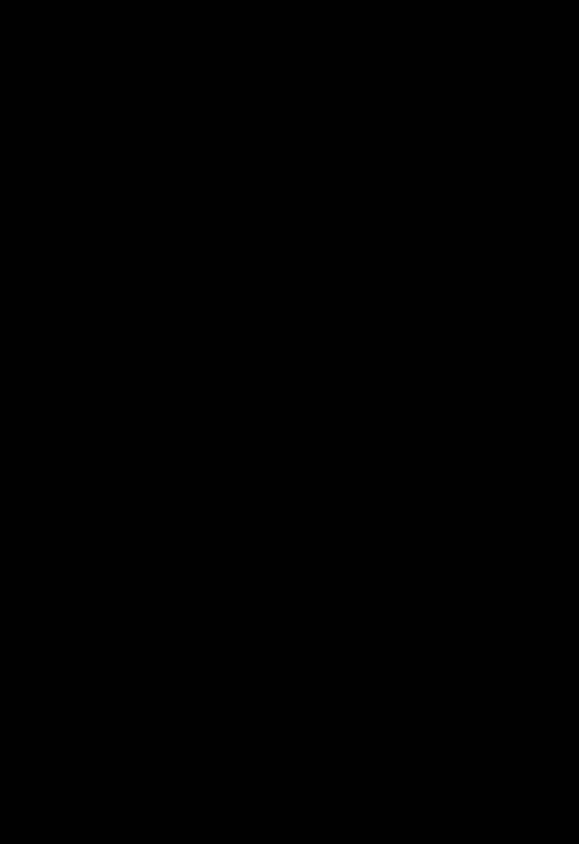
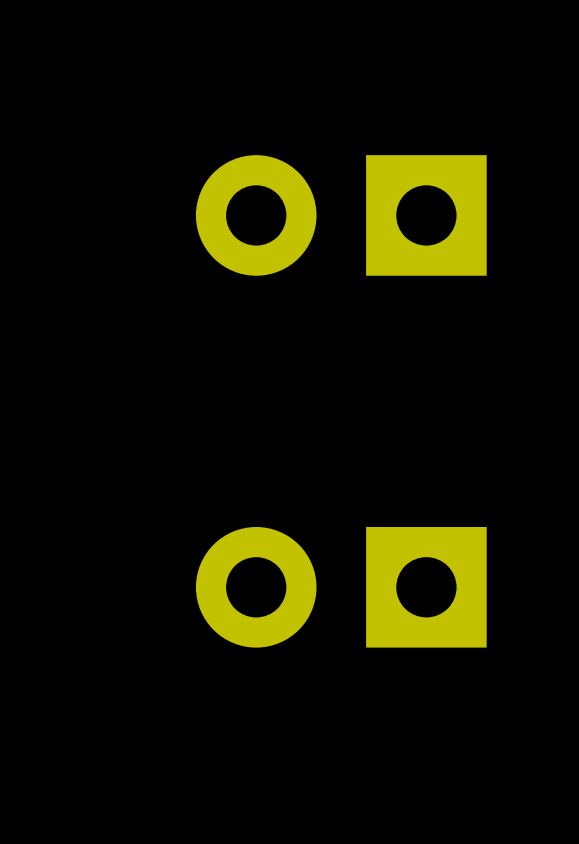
part: none -> (341, 215)
part: none -> (341, 587)

